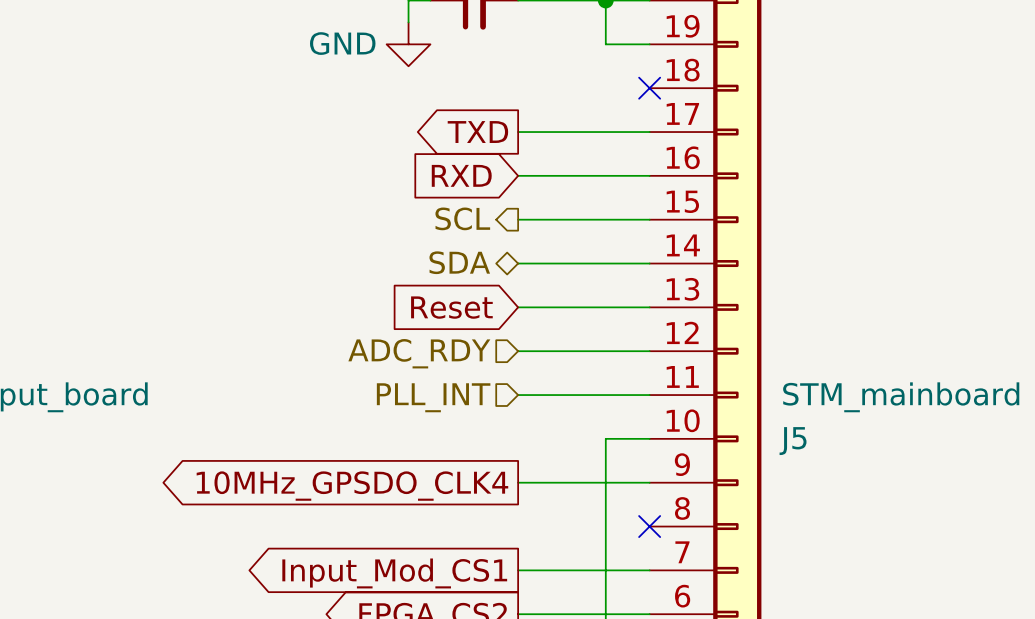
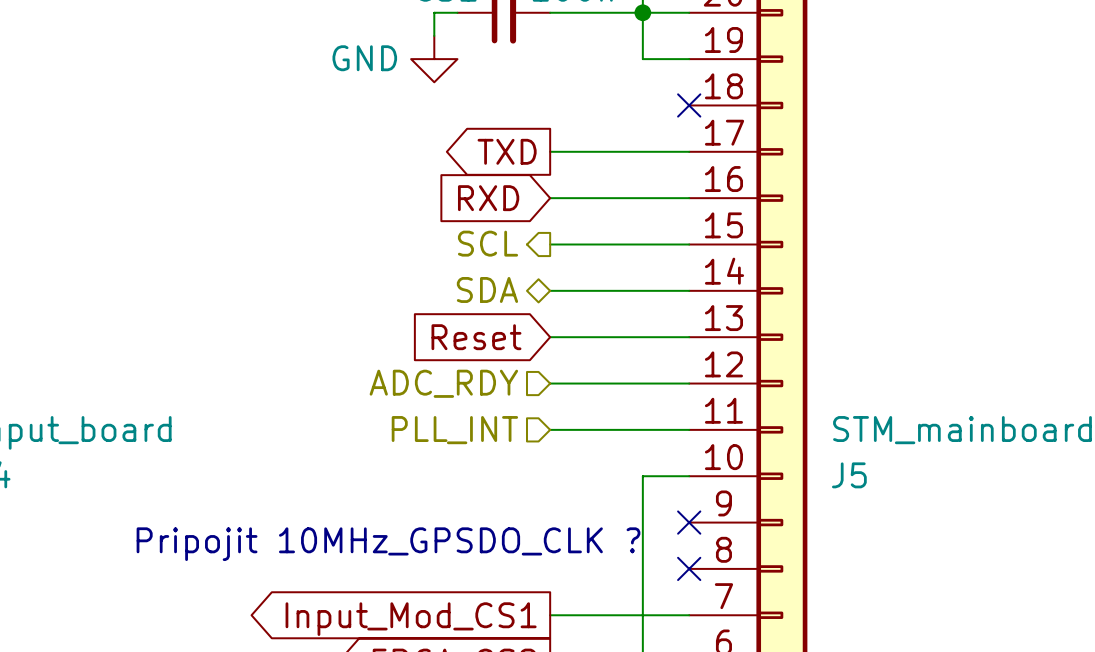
wire: (518, 482) (649, 482) -> none
no-connect mark: none -> (689, 522)
global label: 10MHz_GPSDO_CLK4 (352, 486) -> none
text: none -> Pripojit 10MHz_GPSDO_CLK ? (388, 544)

